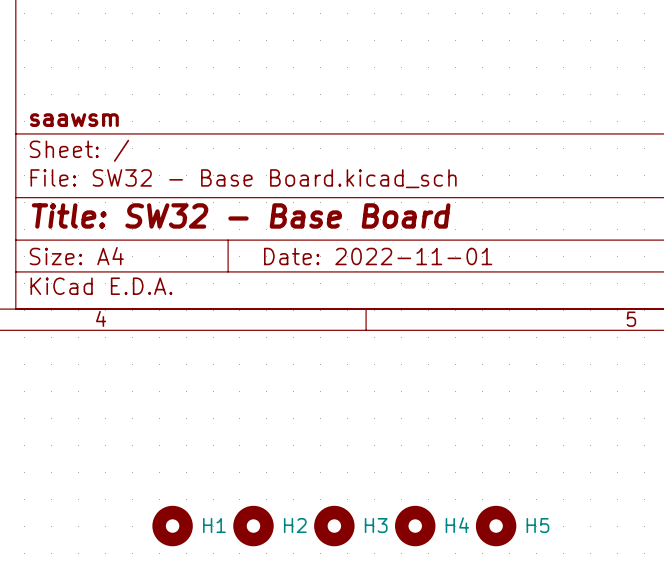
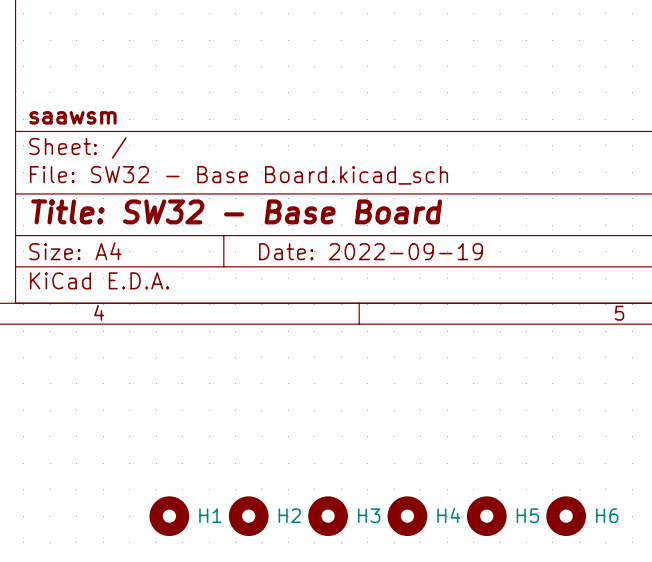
title block: Date: 2022-11-01 (378, 256) -> Date: 2022-09-19 (371, 251)
H6: none -> (566, 516)

